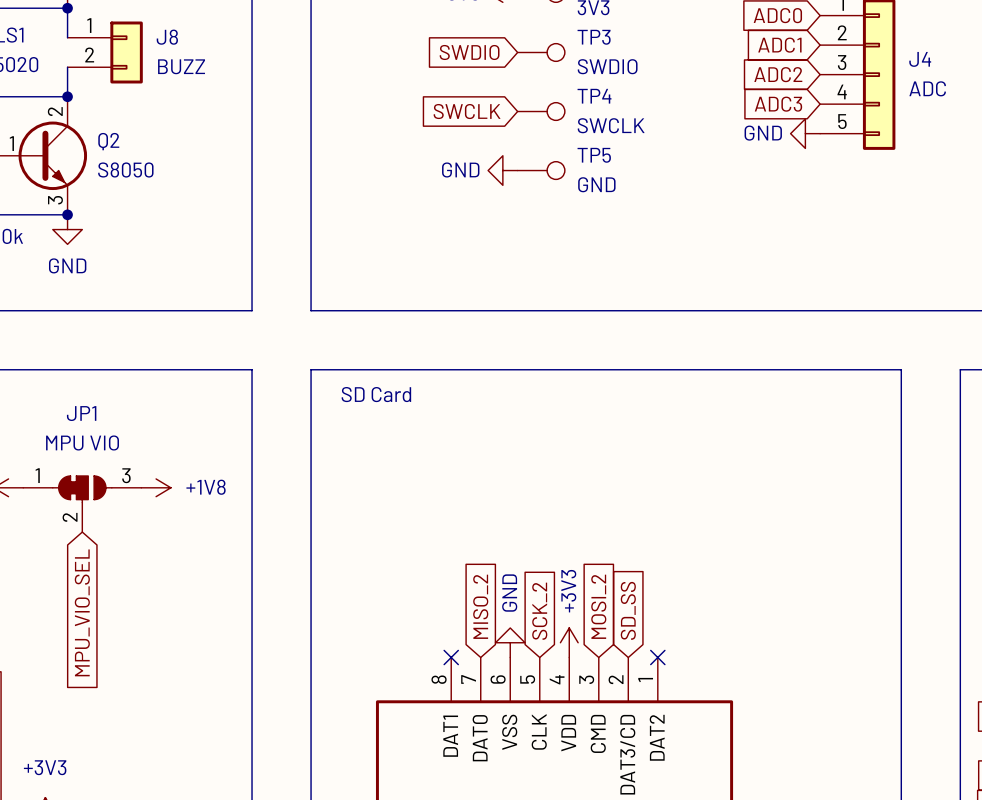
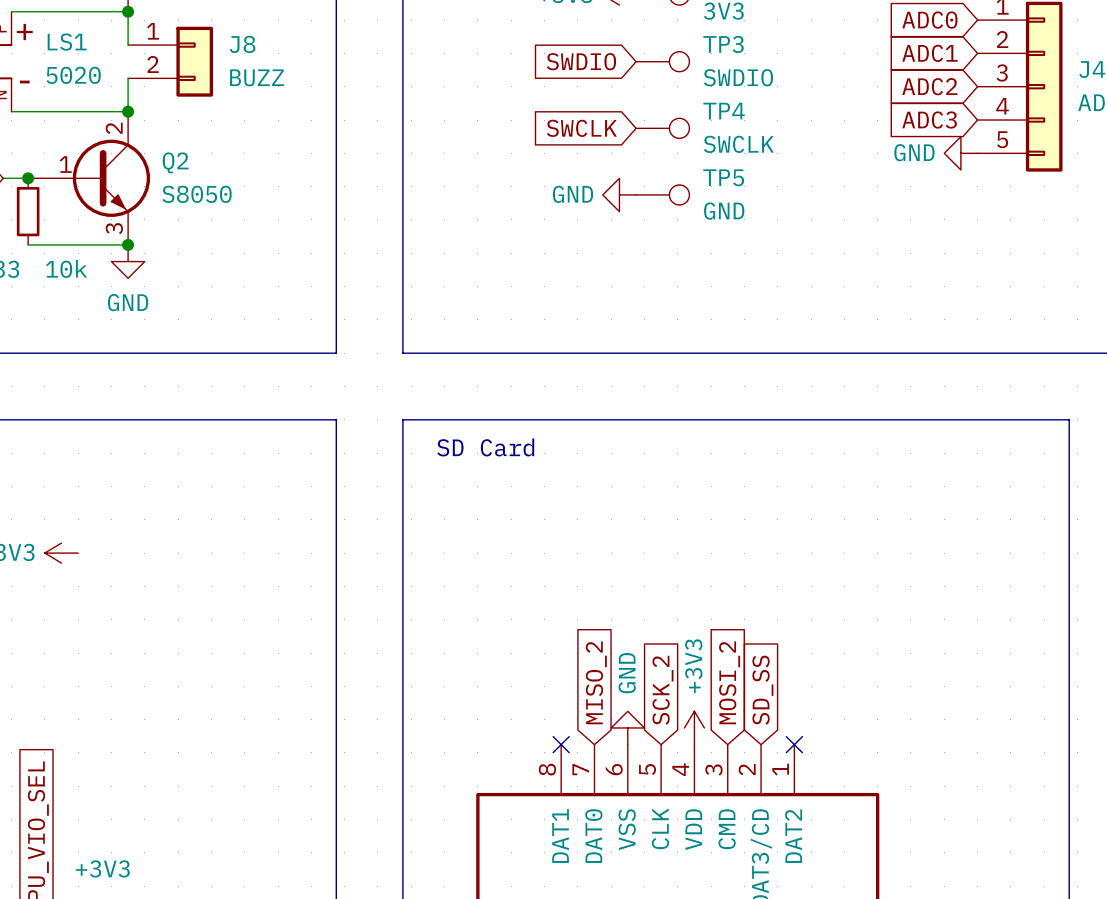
power symbol: +1V8 (156, 487) -> none
JP1: MPU VIO (82, 504) -> none
global label: MPU_VIO_SEL (82, 612) -> none

